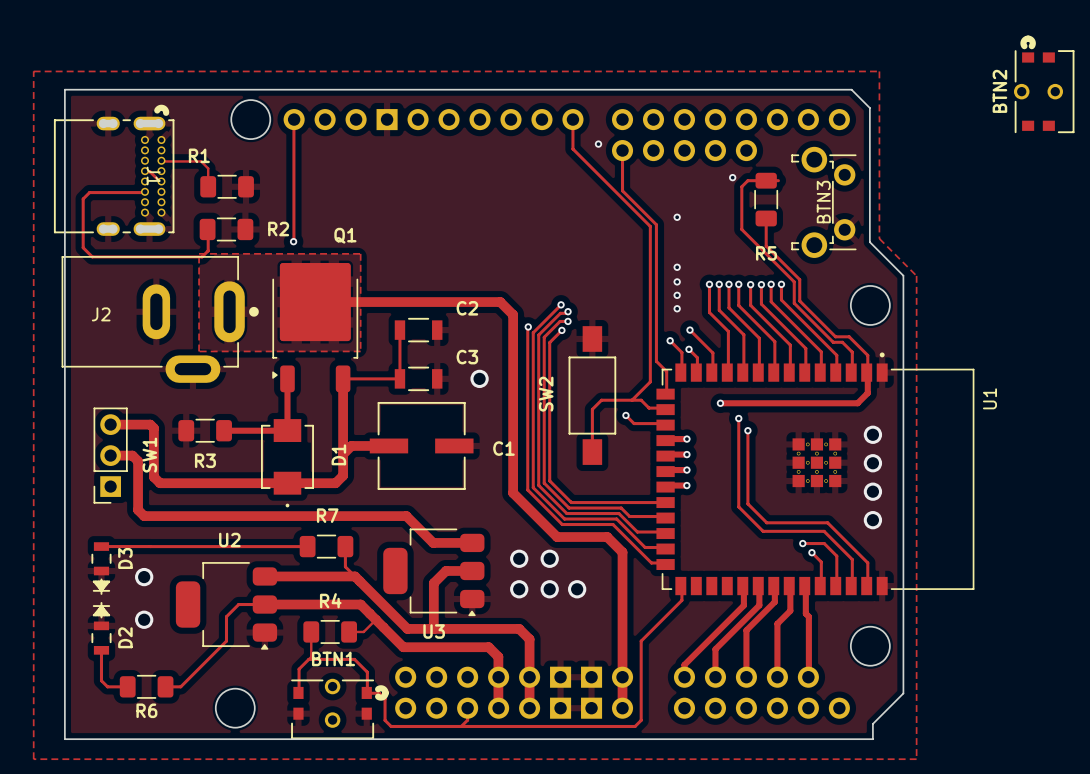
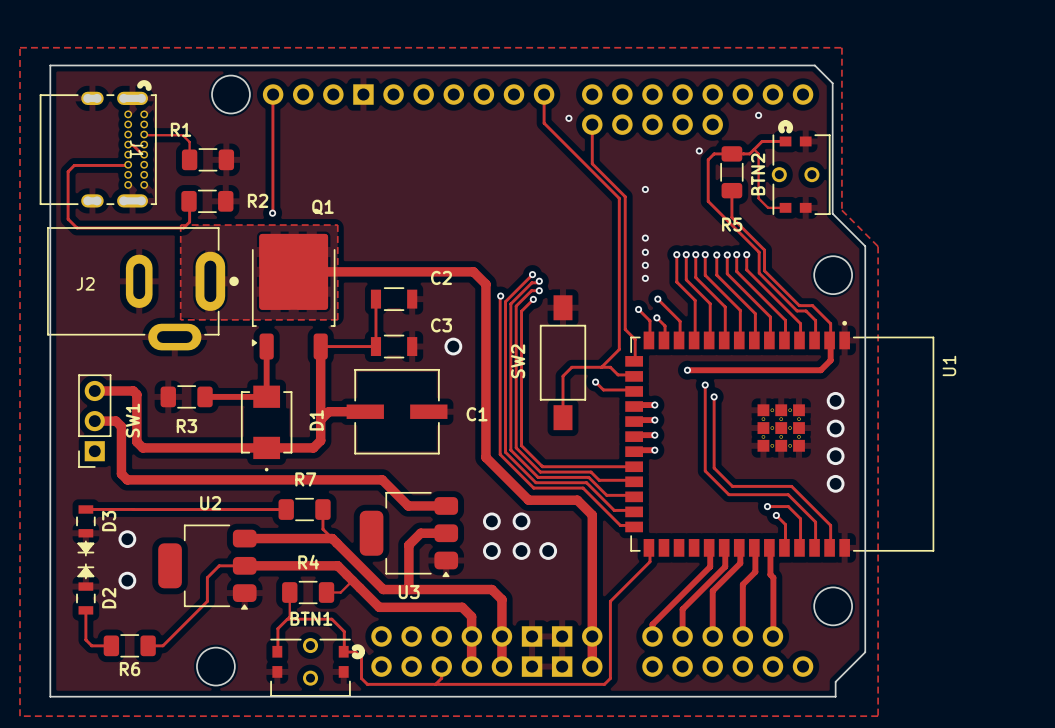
BTN2 position: (1044, 84) -> (801, 167)
via: none -> (758, 115)
track: none -> (785, 141) (762, 141) (749, 153) (743, 153)
track: none -> (754, 149) (758, 153) (758, 198) (768, 207) (785, 207)
BTN3: (823, 202) -> none

